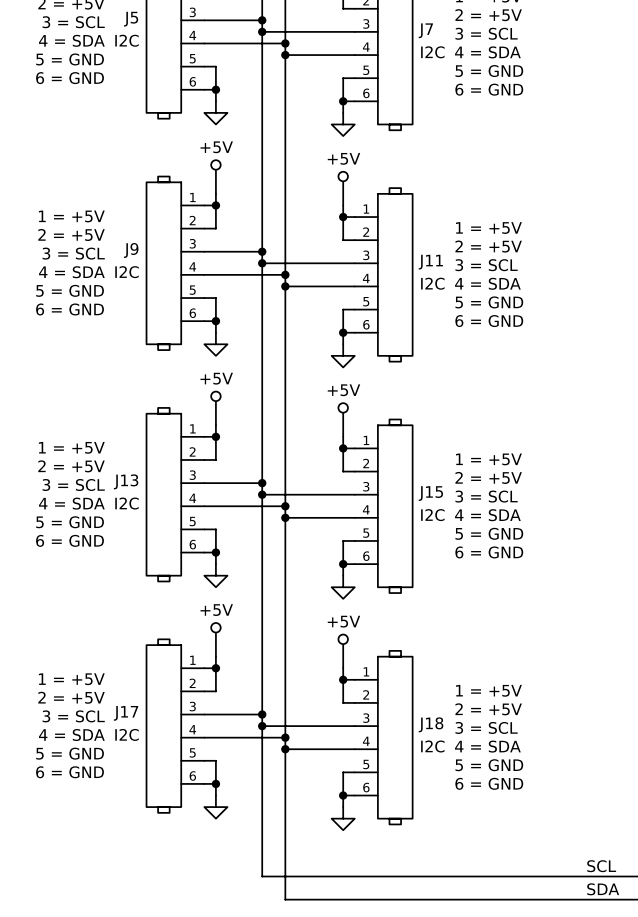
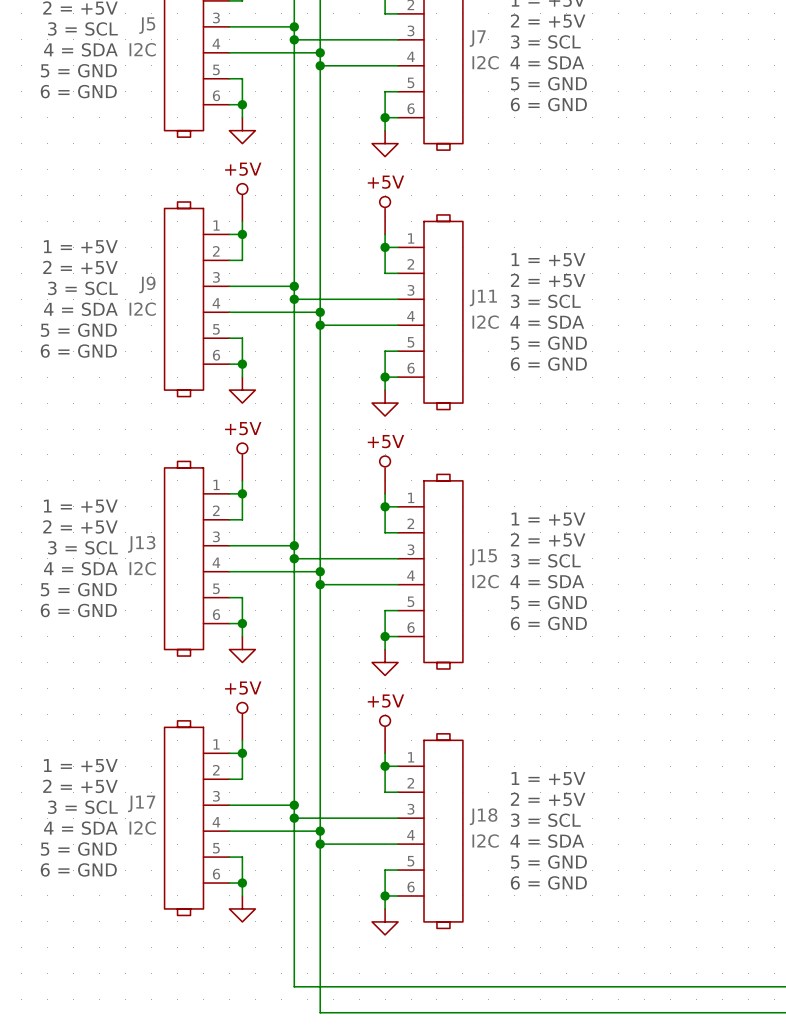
label: SCL (601, 866) -> none
label: SDA (603, 889) -> none

